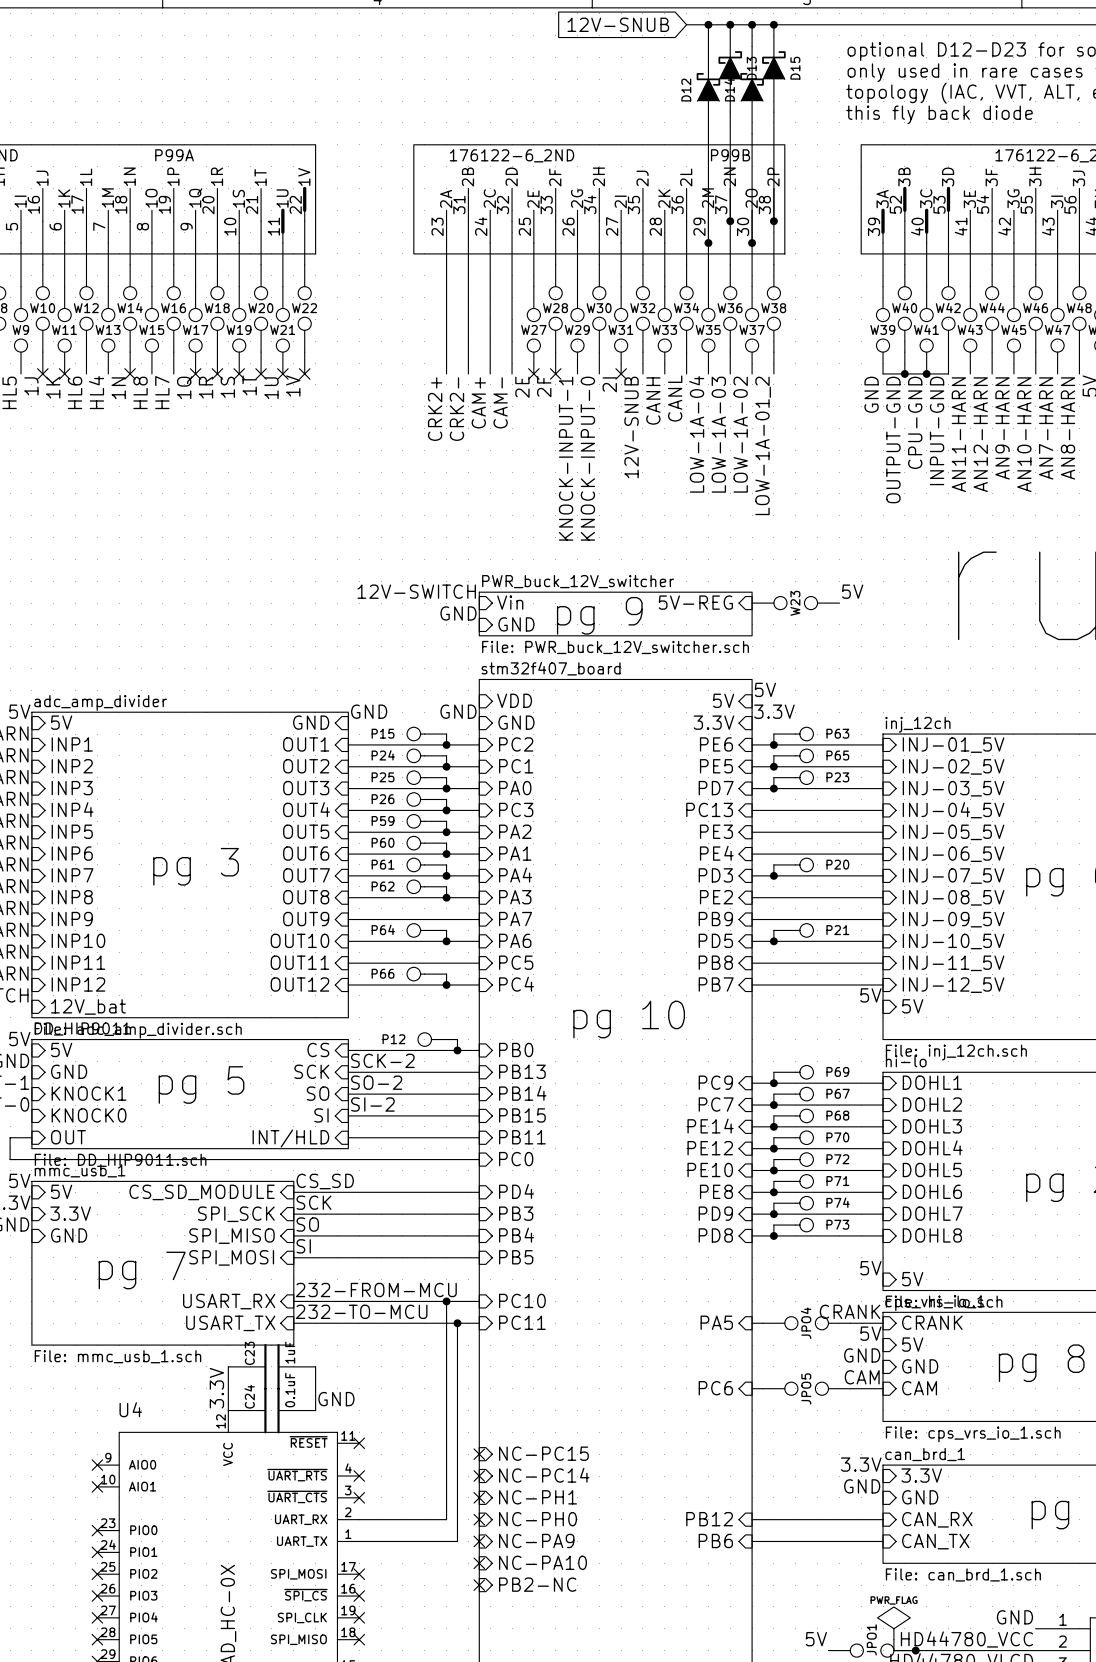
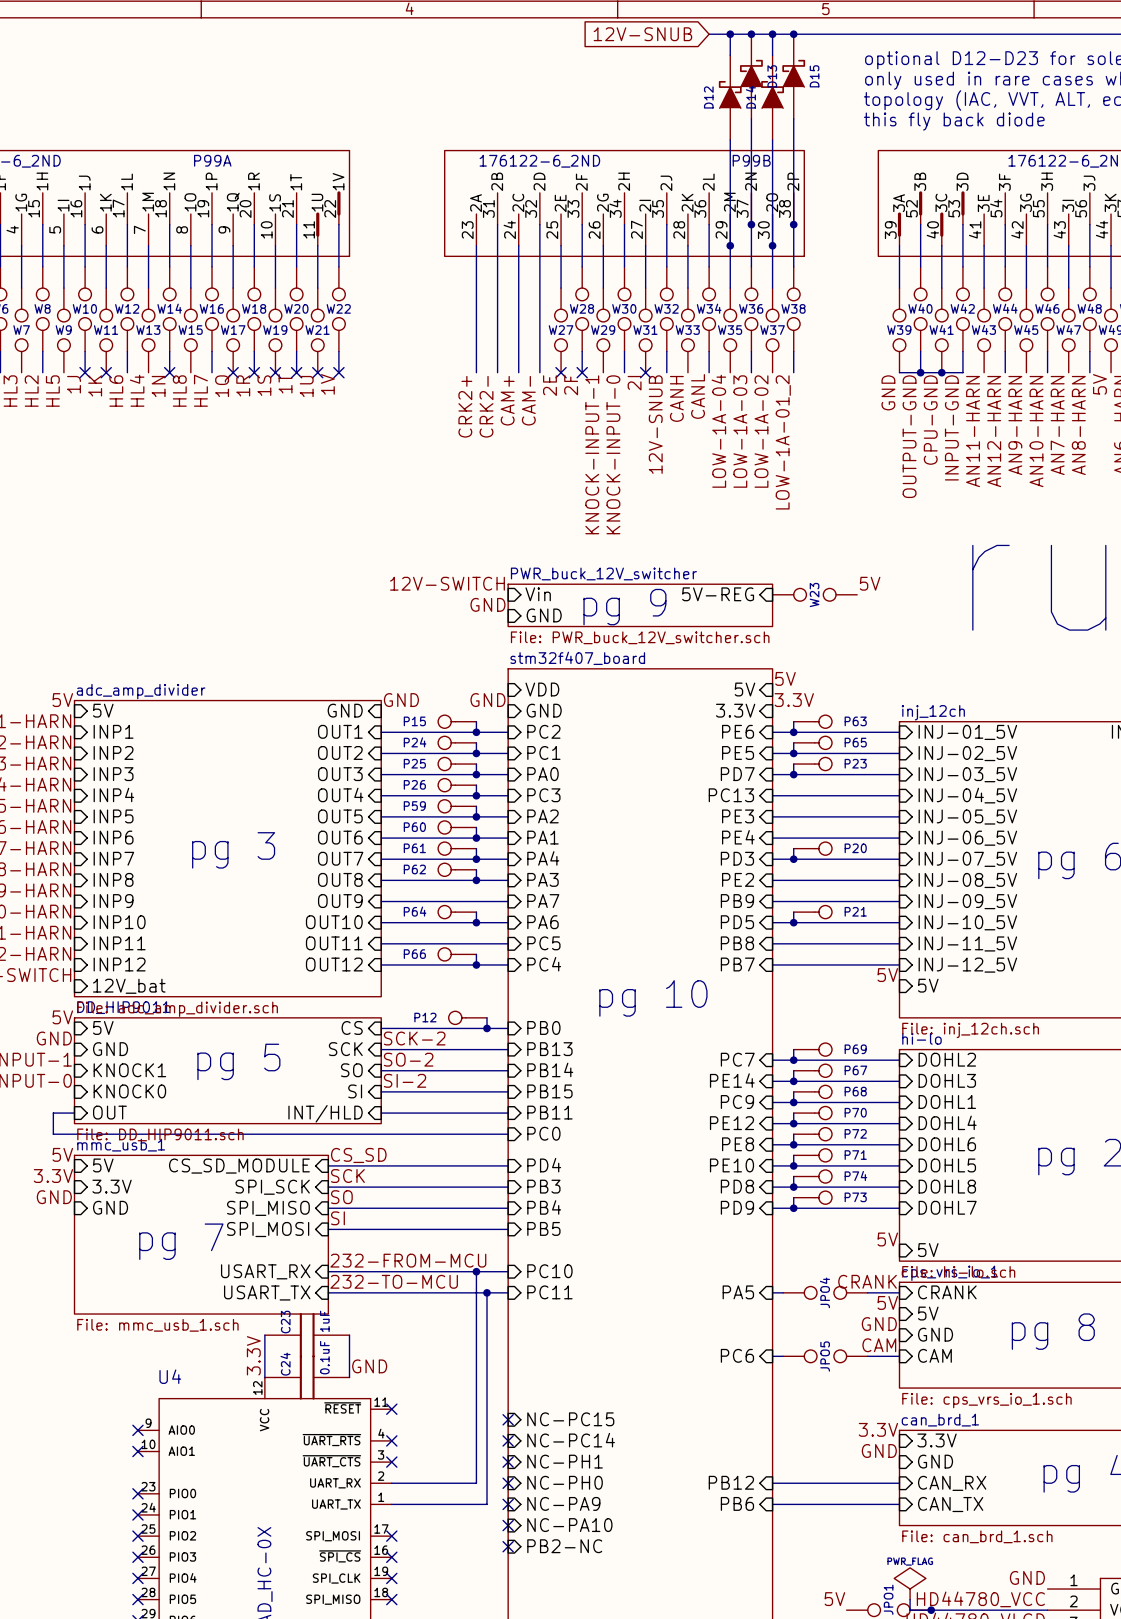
sheet pin: PC9 (715, 1082) -> PC7 (737, 1059)
sheet pin: DOHL1 (932, 1082) -> DOHL2 (947, 1059)
sheet pin: PC7 (716, 1104) -> PE14 (732, 1080)
sheet pin: DOHL2 (932, 1104) -> DOHL3 (947, 1080)
sheet pin: PE14 (710, 1126) -> PC9 (737, 1102)
sheet pin: DOHL3 (932, 1126) -> DOHL1 (947, 1102)
sheet pin: PE10 (710, 1169) -> PE8 (738, 1144)
sheet pin: DOHL5 (932, 1169) -> DOHL6 (947, 1144)
sheet pin: PE8 (716, 1191) -> PE10 (732, 1165)
sheet pin: DOHL6 (932, 1191) -> DOHL5 (947, 1165)
sheet pin: PD9 (715, 1213) -> PD8 (737, 1186)
sheet pin: DOHL7 (932, 1213) -> DOHL8 (947, 1186)
sheet pin: PD8 (715, 1235) -> PD9 (737, 1207)
sheet pin: DOHL8 (932, 1235) -> DOHL7 (947, 1207)

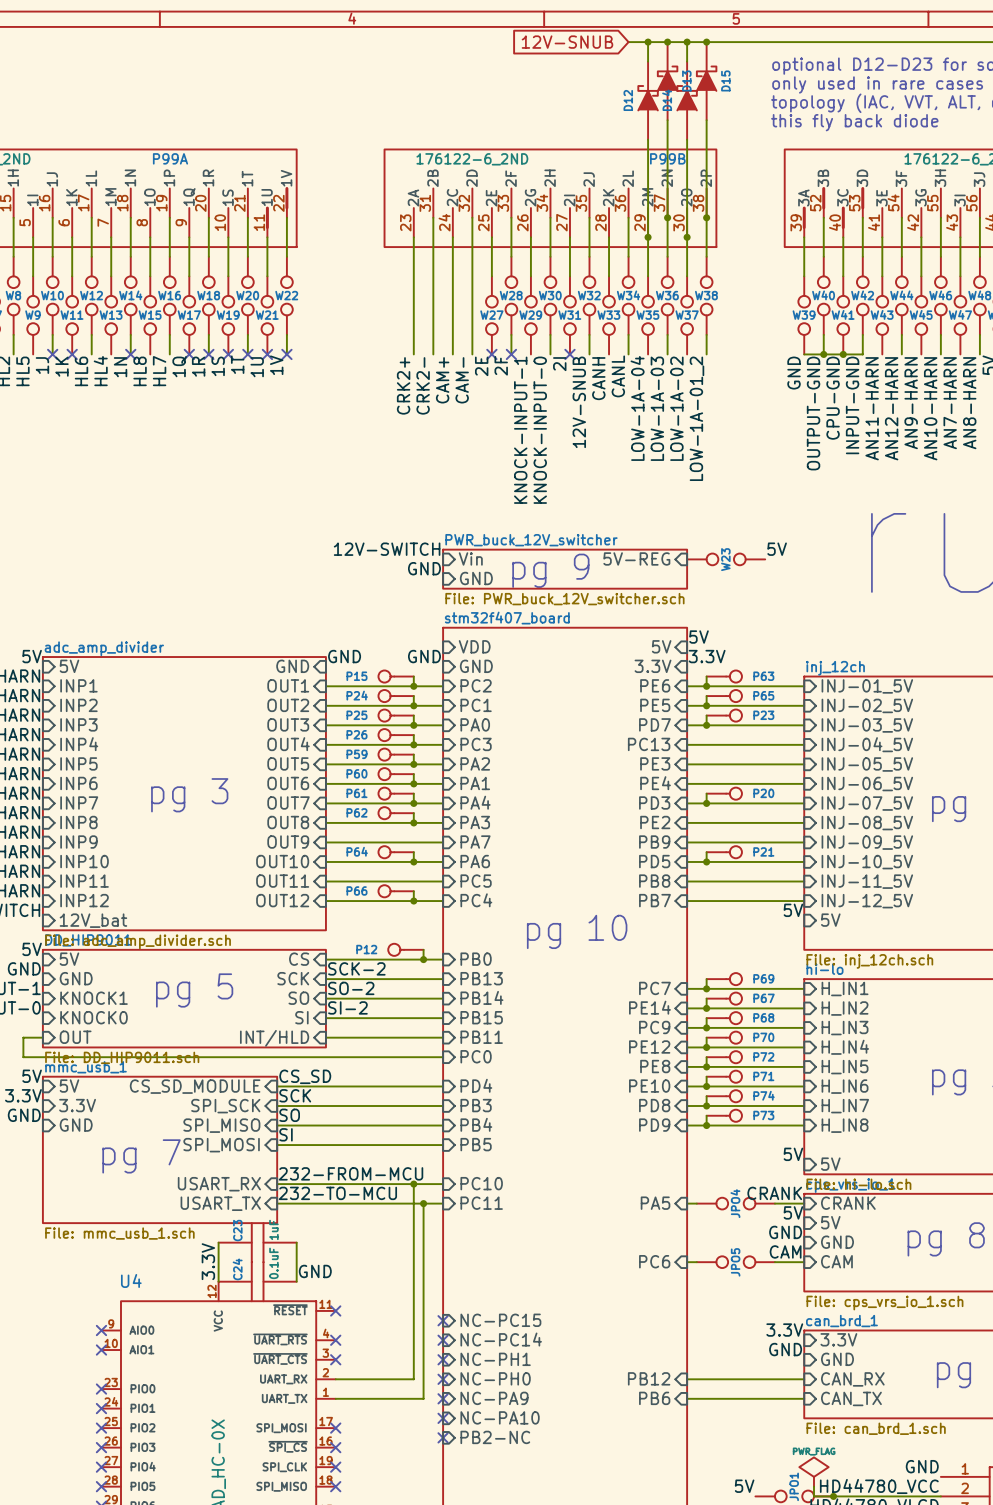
sheet pin: DOHL2 (947, 1059) -> H_IN1 (845, 988)
sheet pin: DOHL3 (947, 1080) -> H_IN2 (845, 1008)
sheet pin: DOHL1 (947, 1102) -> H_IN3 (845, 1028)
sheet pin: DOHL4 (947, 1122) -> H_IN4 (845, 1047)
sheet pin: DOHL6 (947, 1144) -> H_IN5 (845, 1067)
sheet pin: DOHL5 (947, 1165) -> H_IN6 (845, 1086)
sheet pin: DOHL8 (947, 1186) -> H_IN7 (845, 1106)
sheet pin: DOHL7 (947, 1207) -> H_IN8 (845, 1125)

